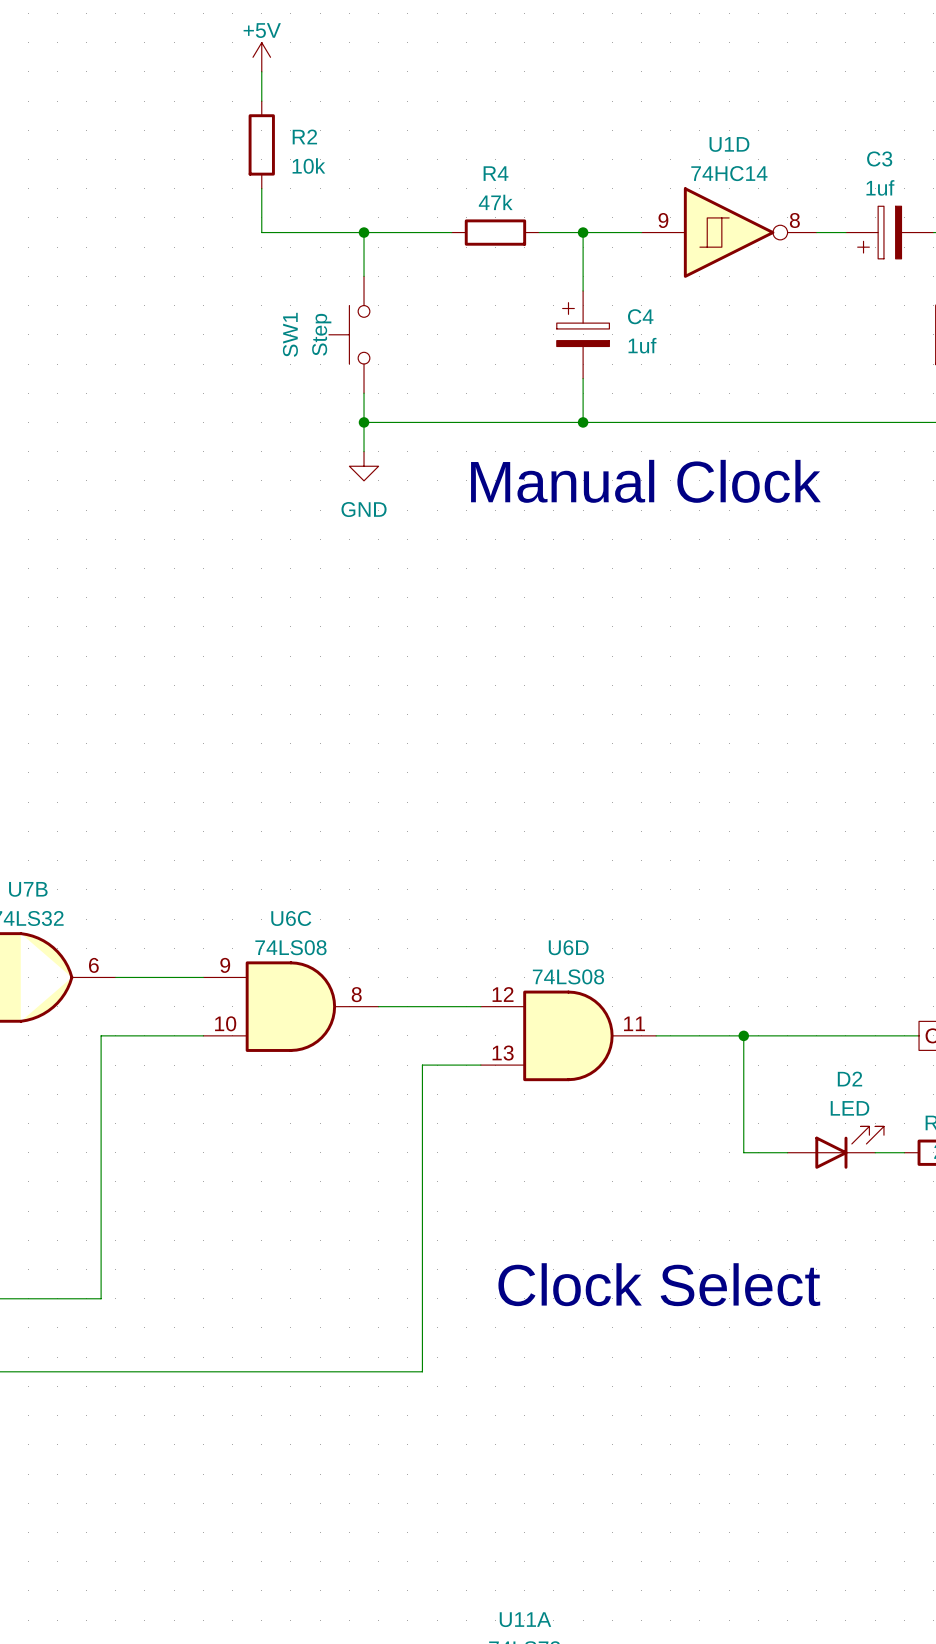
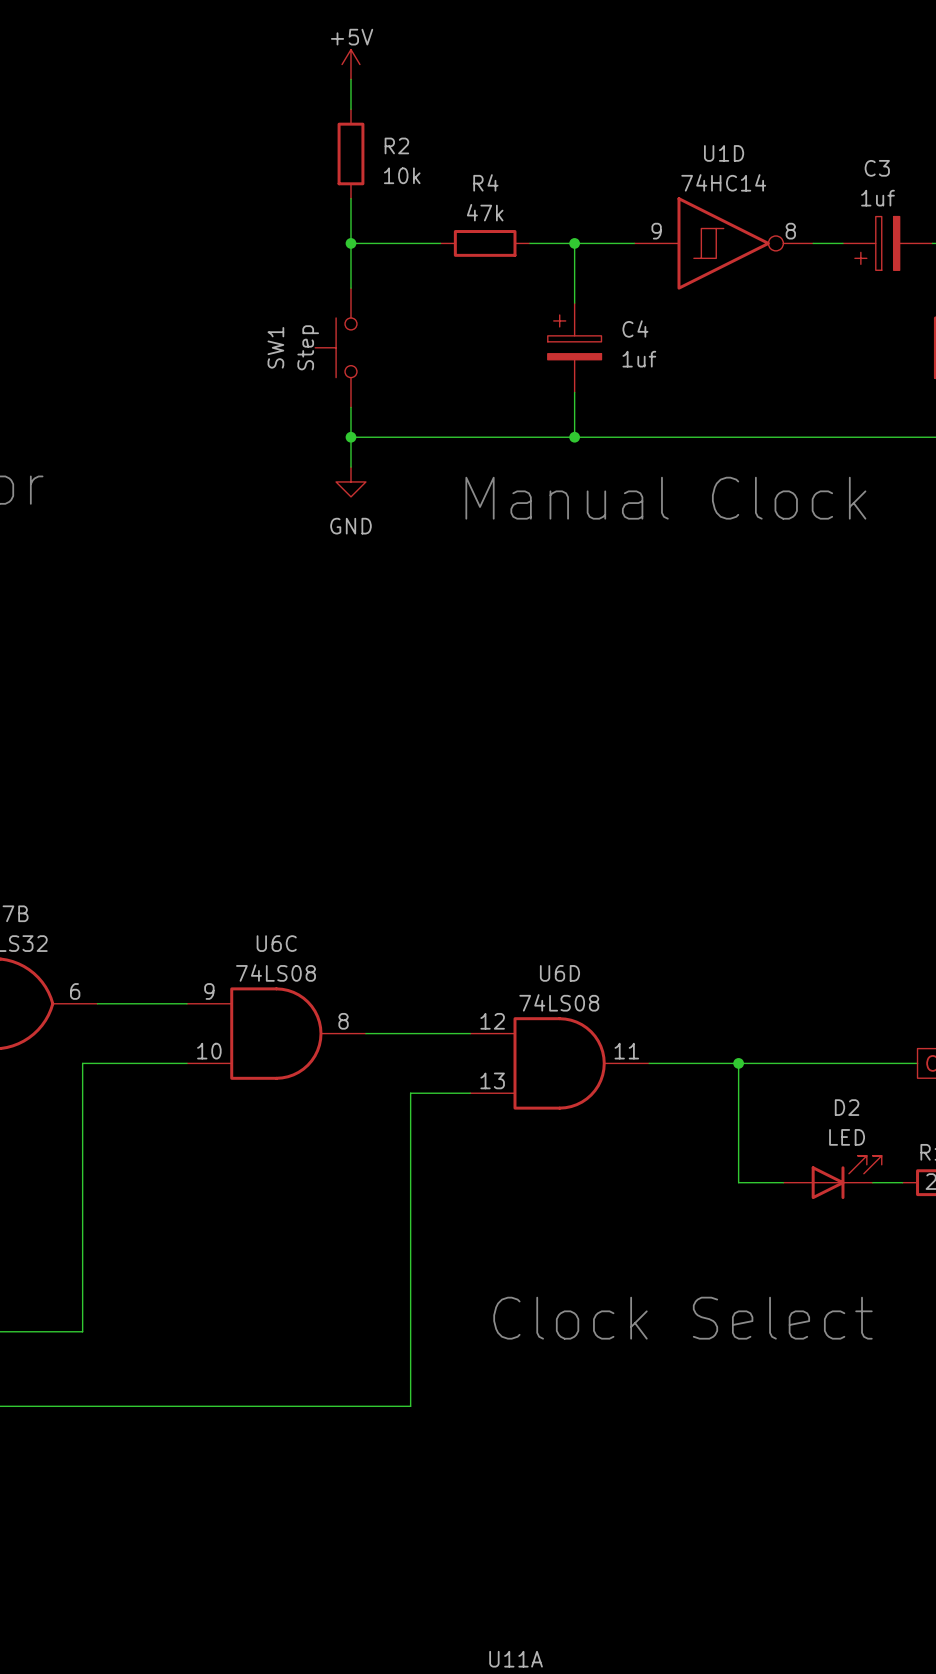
power symbol position: +5V (261, 57) -> +5V (350, 64)
wire: (261, 71) (261, 101) -> (350, 79) (350, 109)
R2 position: (261, 144) -> (350, 153)
wire: (261, 188) (261, 232) (364, 232) -> (350, 198) (350, 243)

